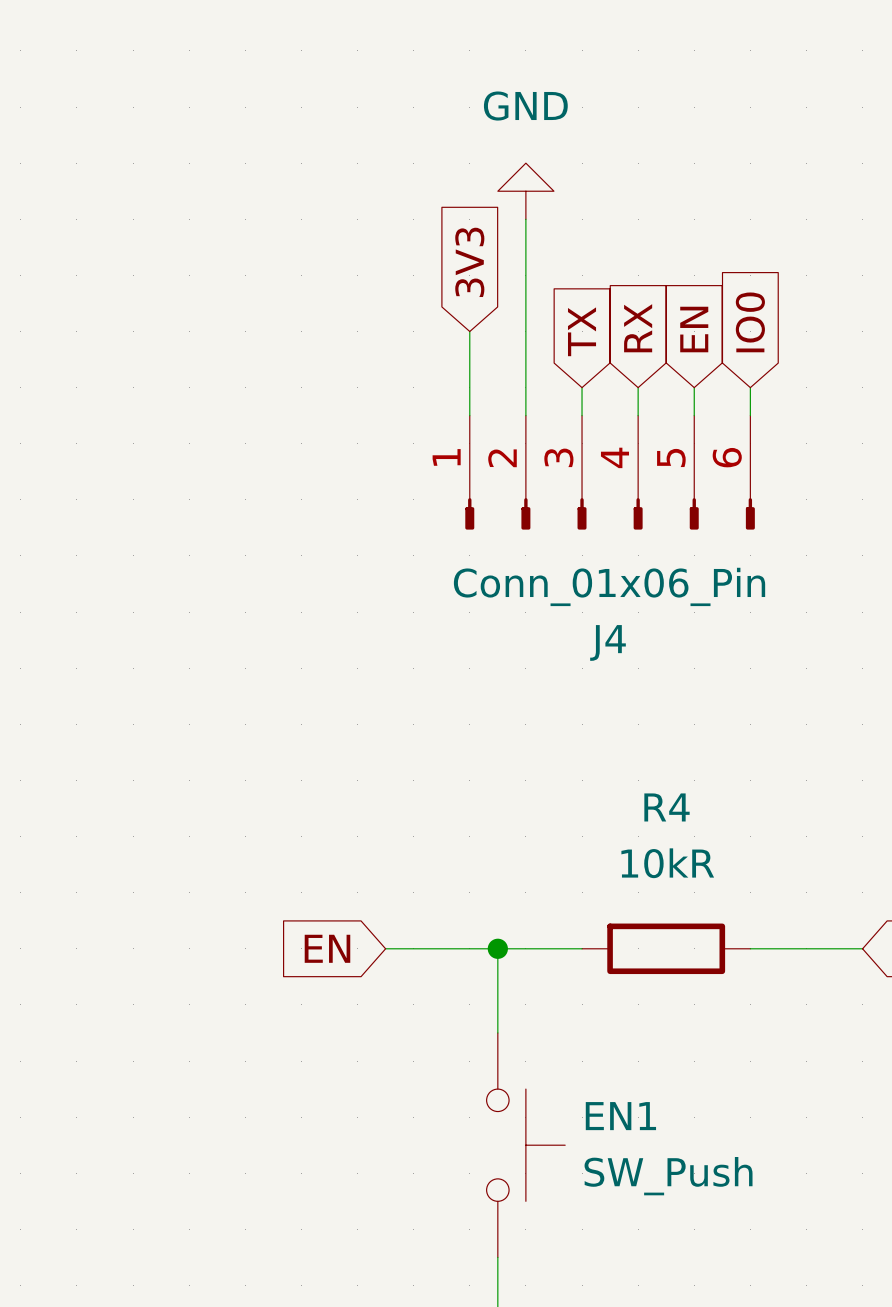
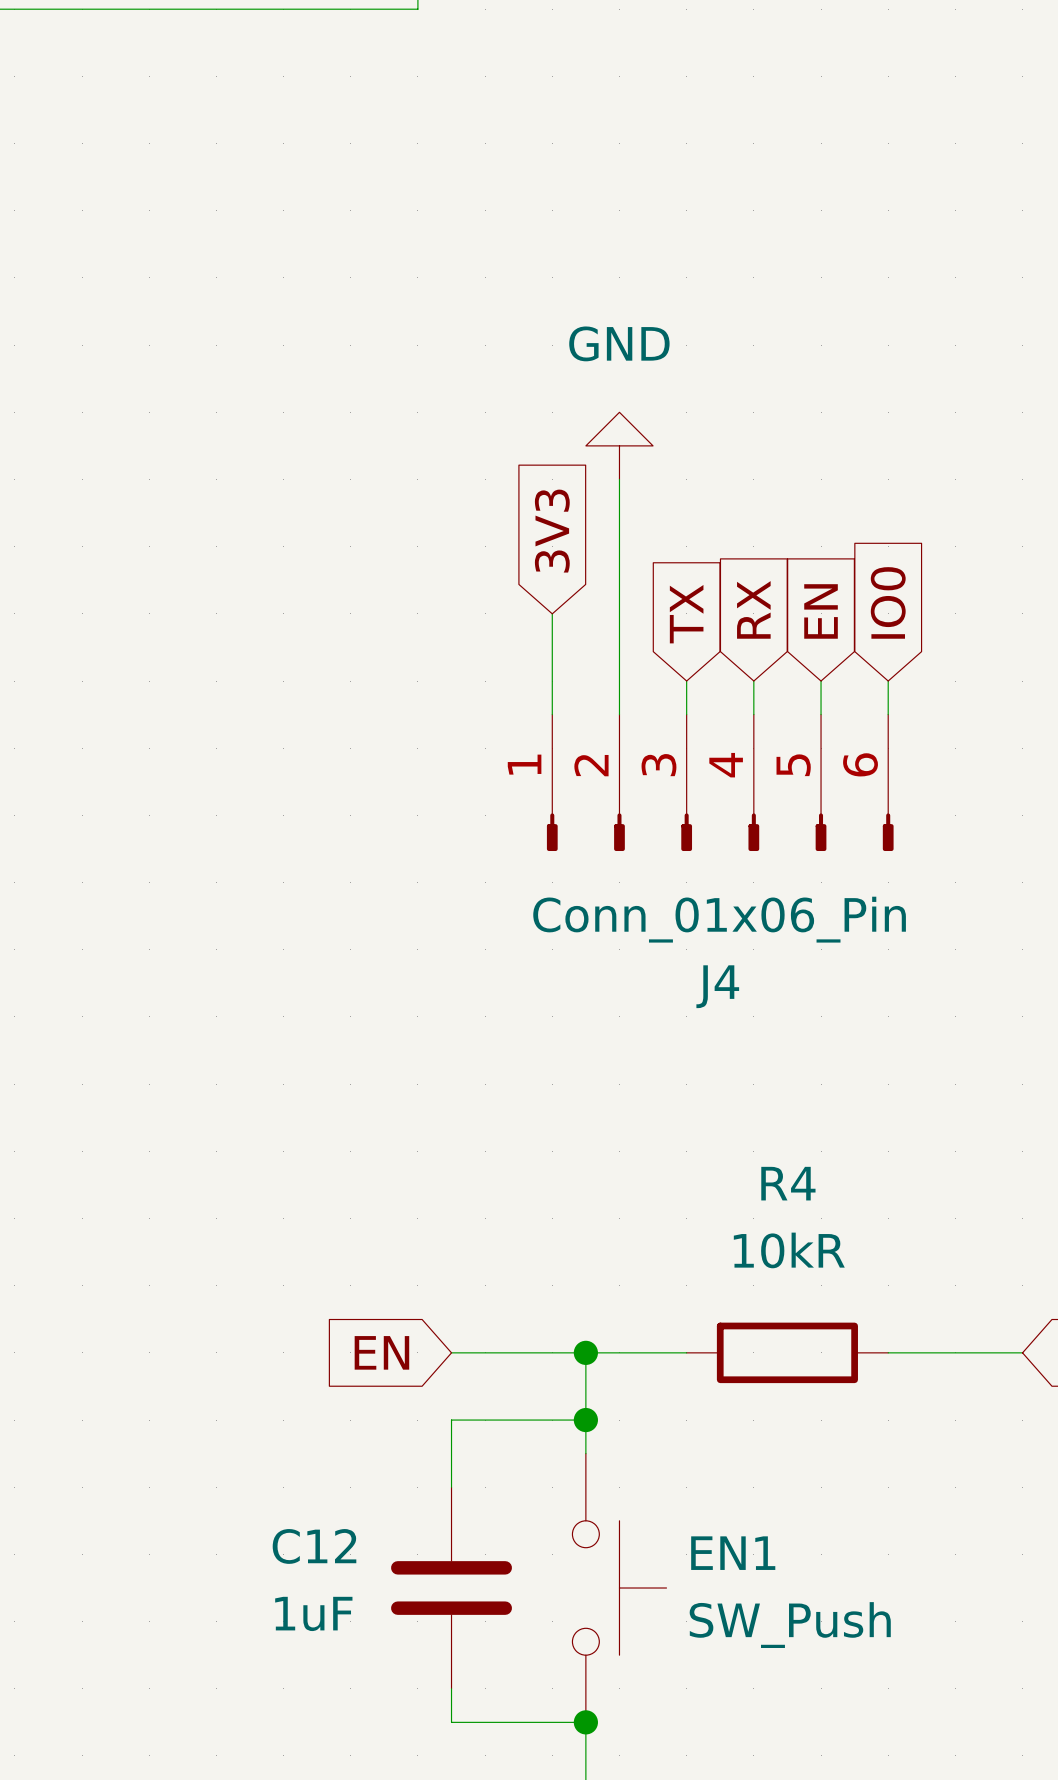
wire: none -> (585, 1420) (451, 1420) (451, 1487)
junction: none -> (585, 1420)
C12: none -> 1uF (451, 1588)
wire: none -> (451, 1688) (451, 1722) (585, 1722)
junction: none -> (585, 1722)

